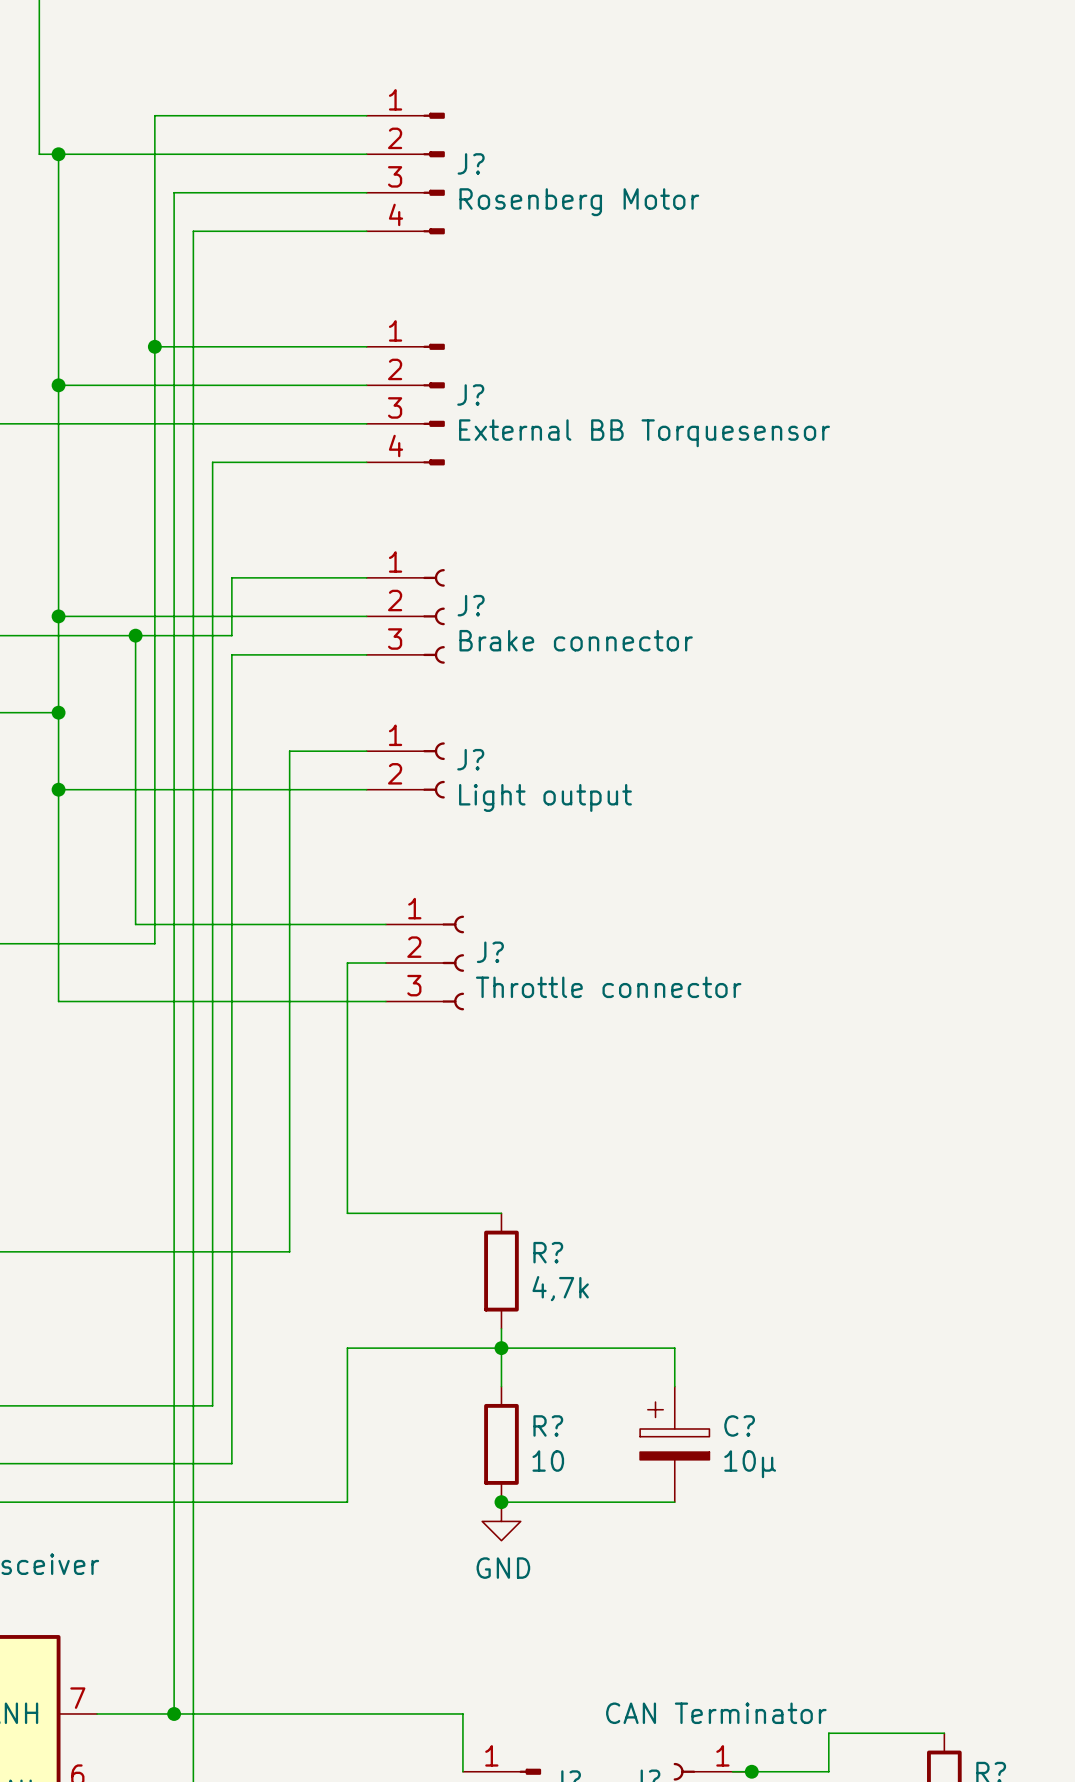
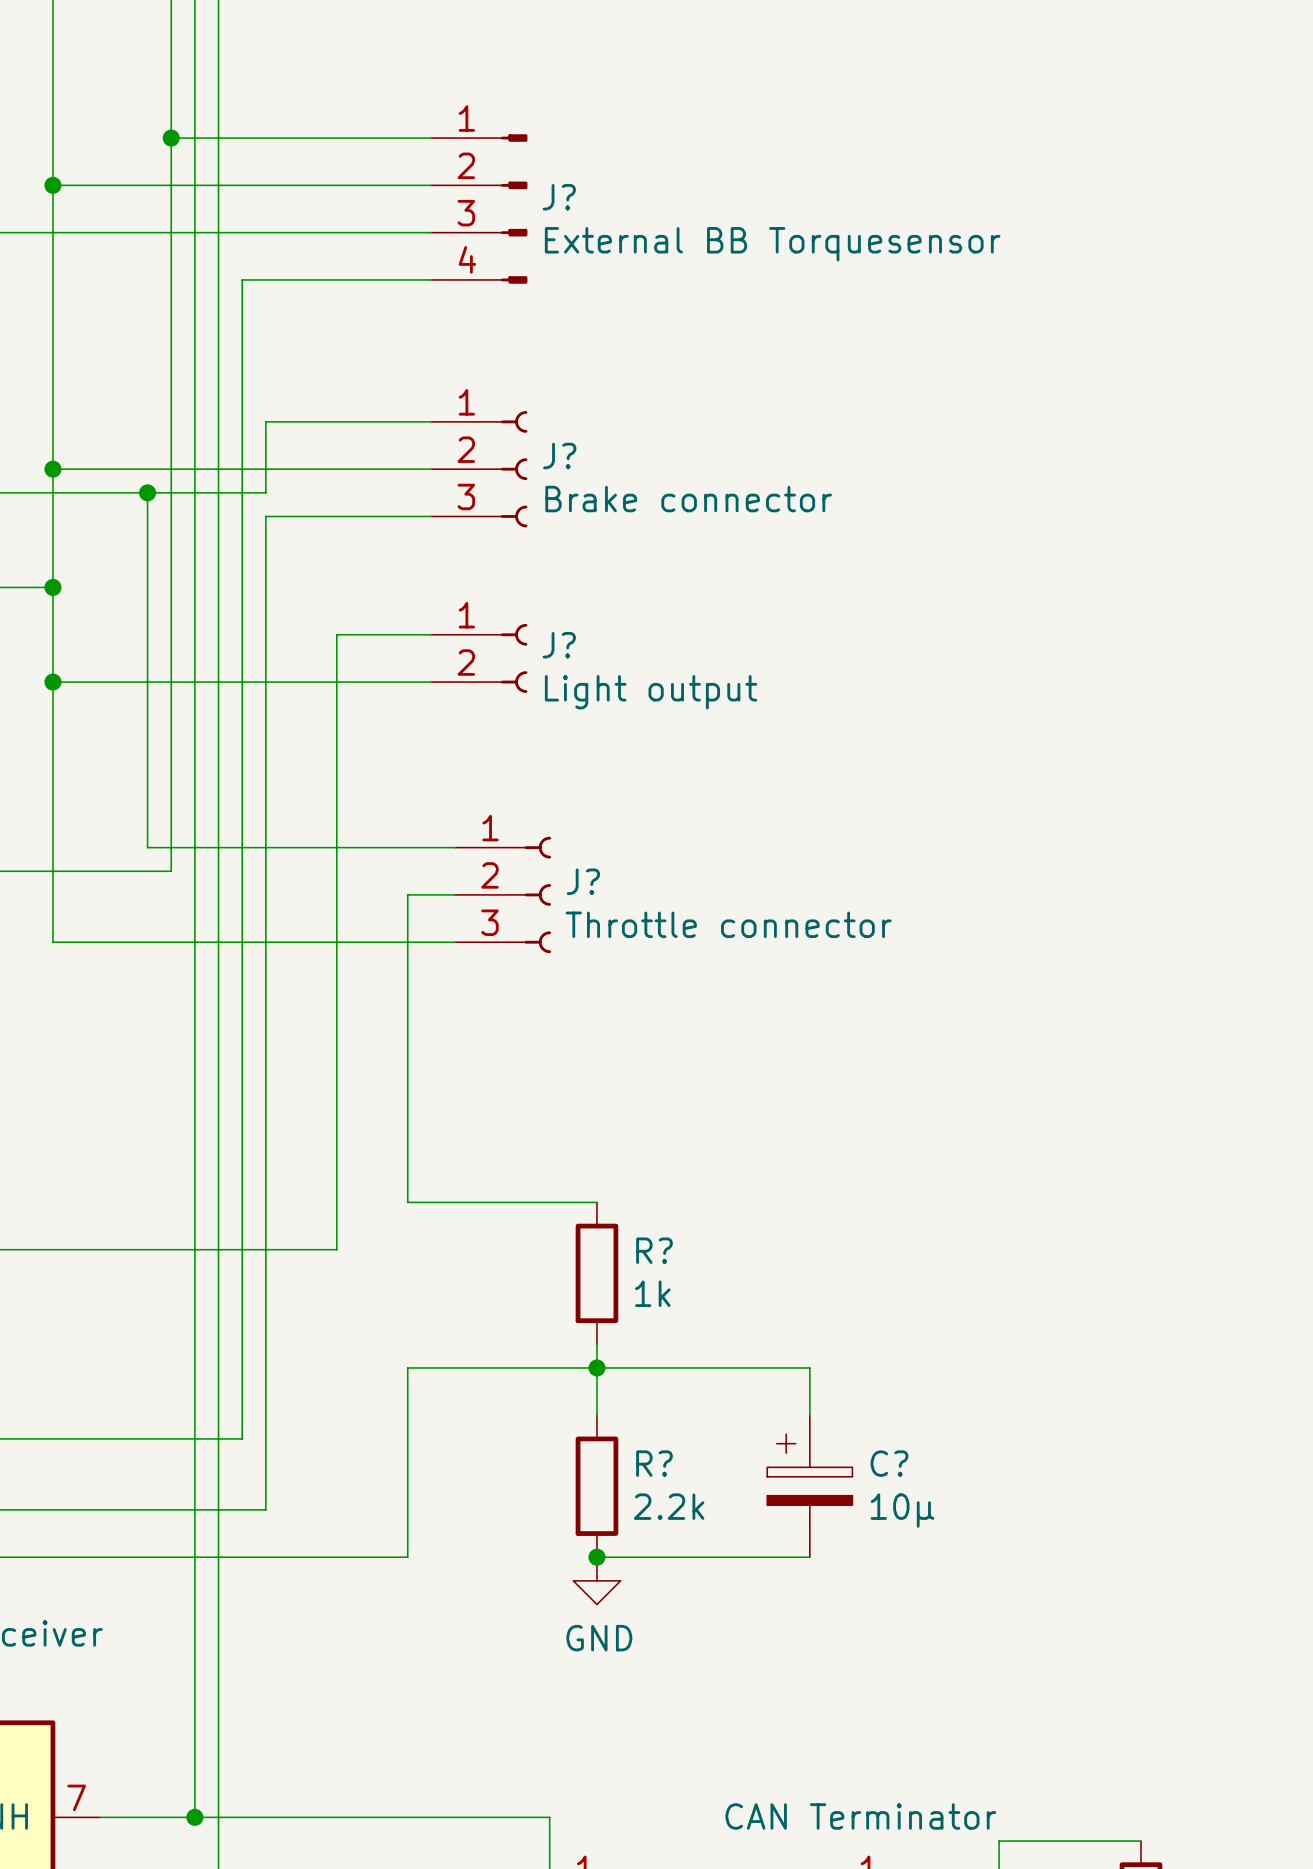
R? value: 4,7k (560, 1288) -> 1k (652, 1293)
R? value: 10 (548, 1461) -> 2.2k (669, 1506)

